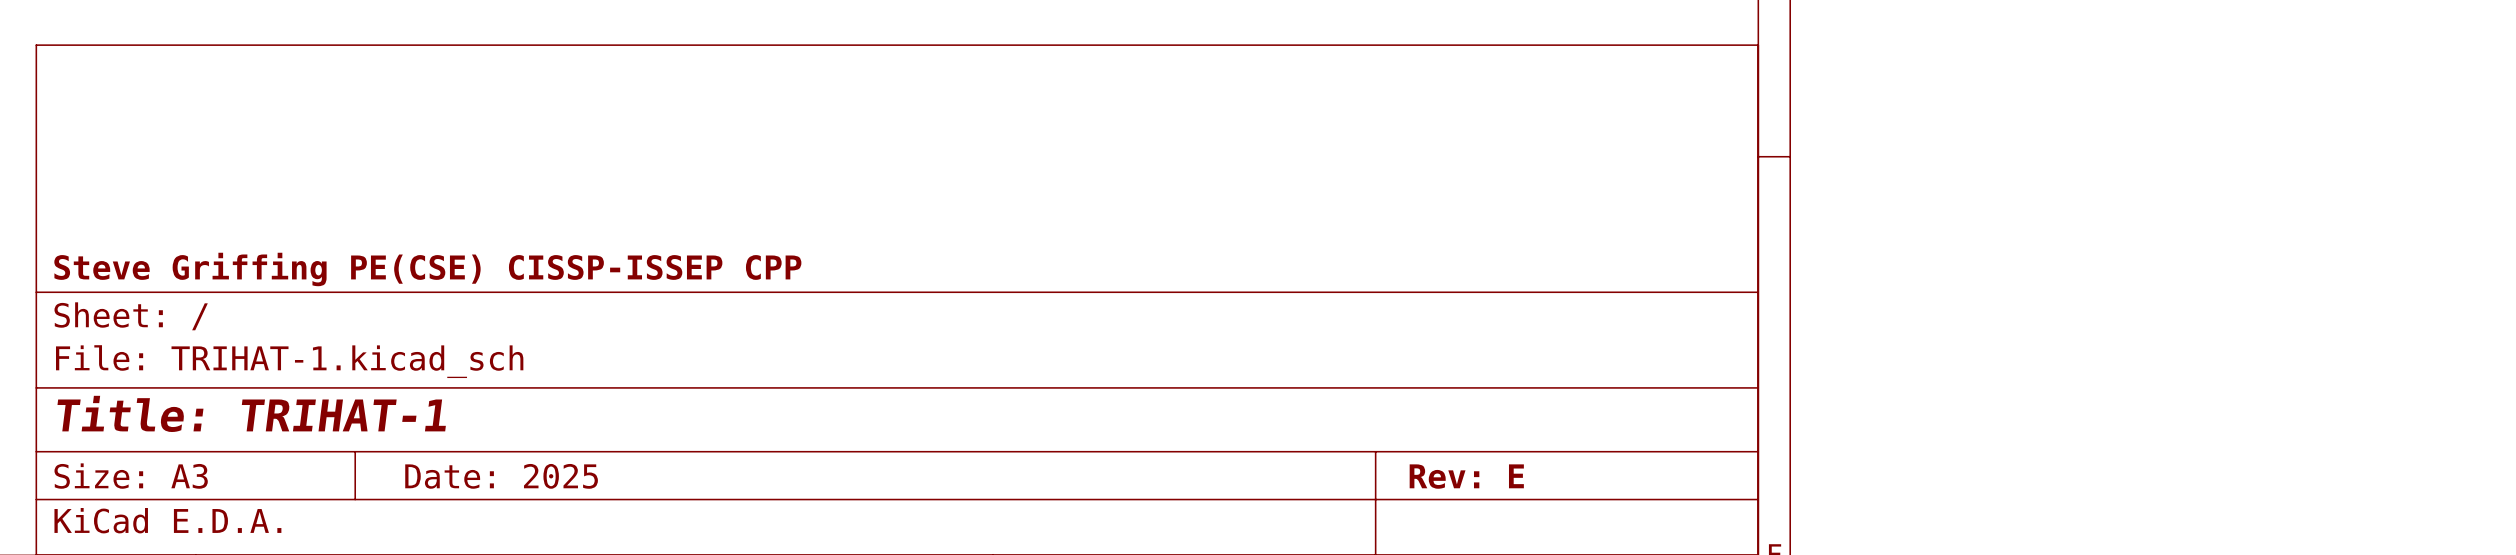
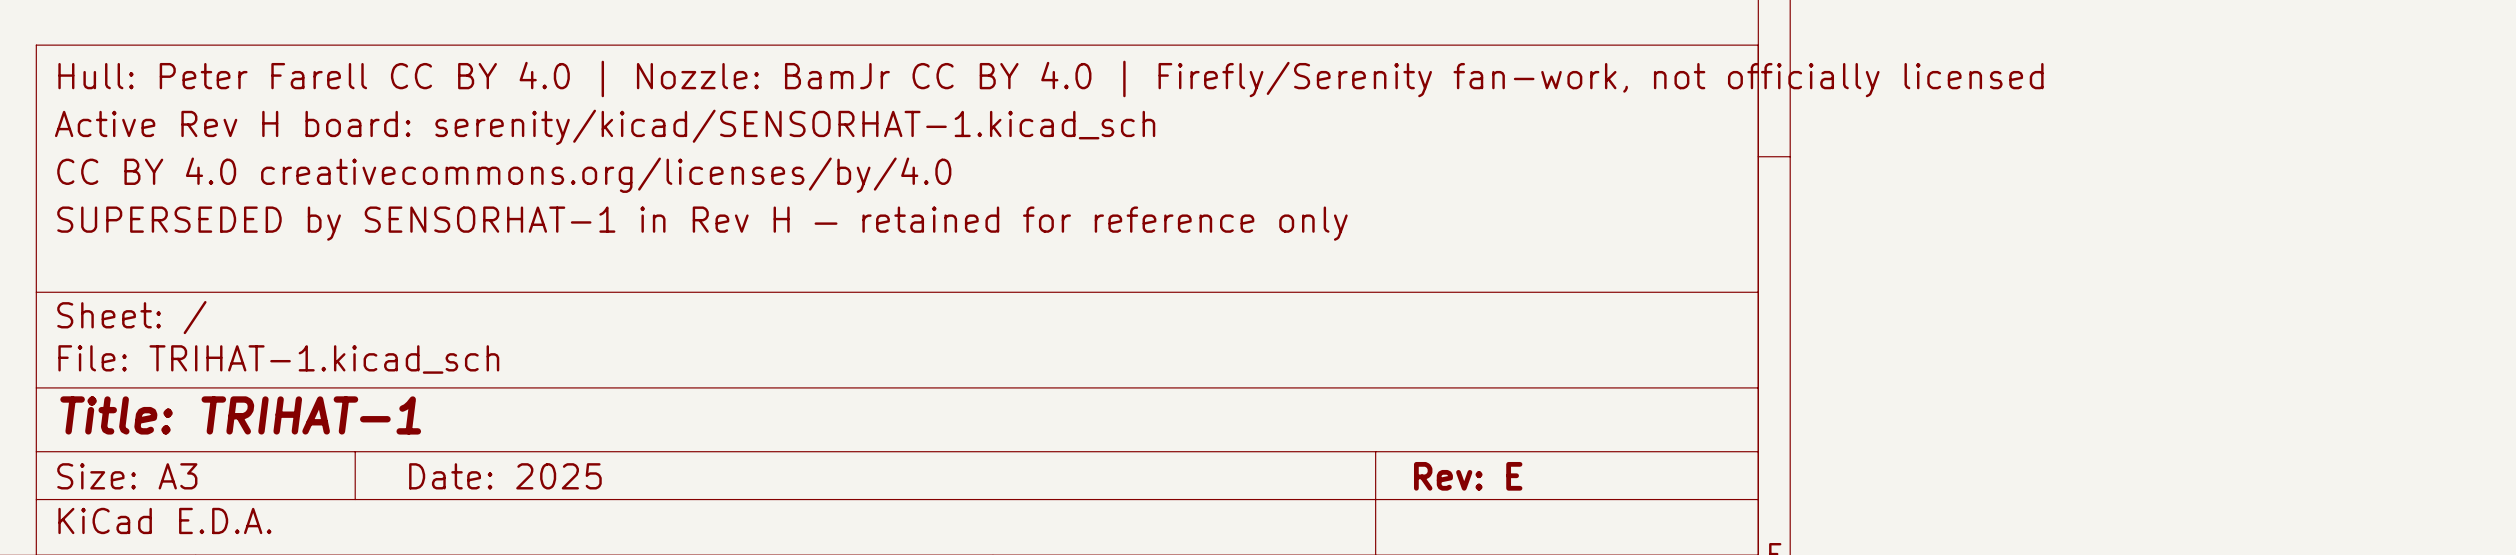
title block: none -> Hull: Peter Farell CC BY 4.0 | Nozzle: BamJr CC BY 4.0 | Firefly/Serenity fan-work, not officially licensed (1050, 78)
title block: none -> Active Rev H board: serenity/kicad/SENSORHAT-1.kicad_sch (605, 127)
title block: none -> CC BY 4.0 creativecommons.org/licenses/by/4.0 (504, 175)
title block: none -> SUPERSEDED by SENSORHAT-1 in Rev H — retained for reference only (702, 223)
title block: Steve Griffing PE(CSE) CISSP-ISSEP CPP (427, 269) -> none

